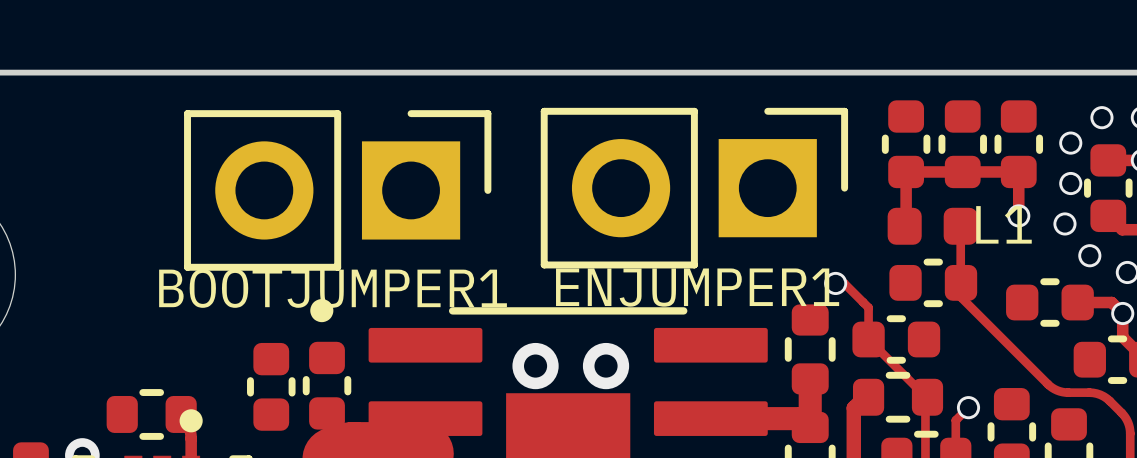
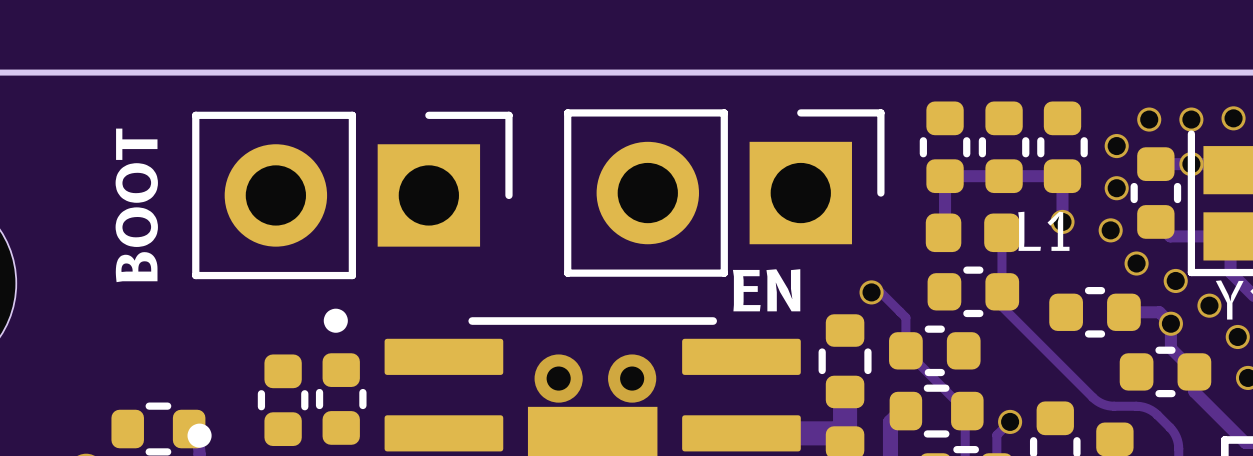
text: none -> BOOT (136, 205)
text: none -> EN (766, 290)
ENJUMPER1 name: ENJUMPER1 (697, 287) -> none
BOOTJUMPER1 name: BOOTJUMPER1 (333, 288) -> none

